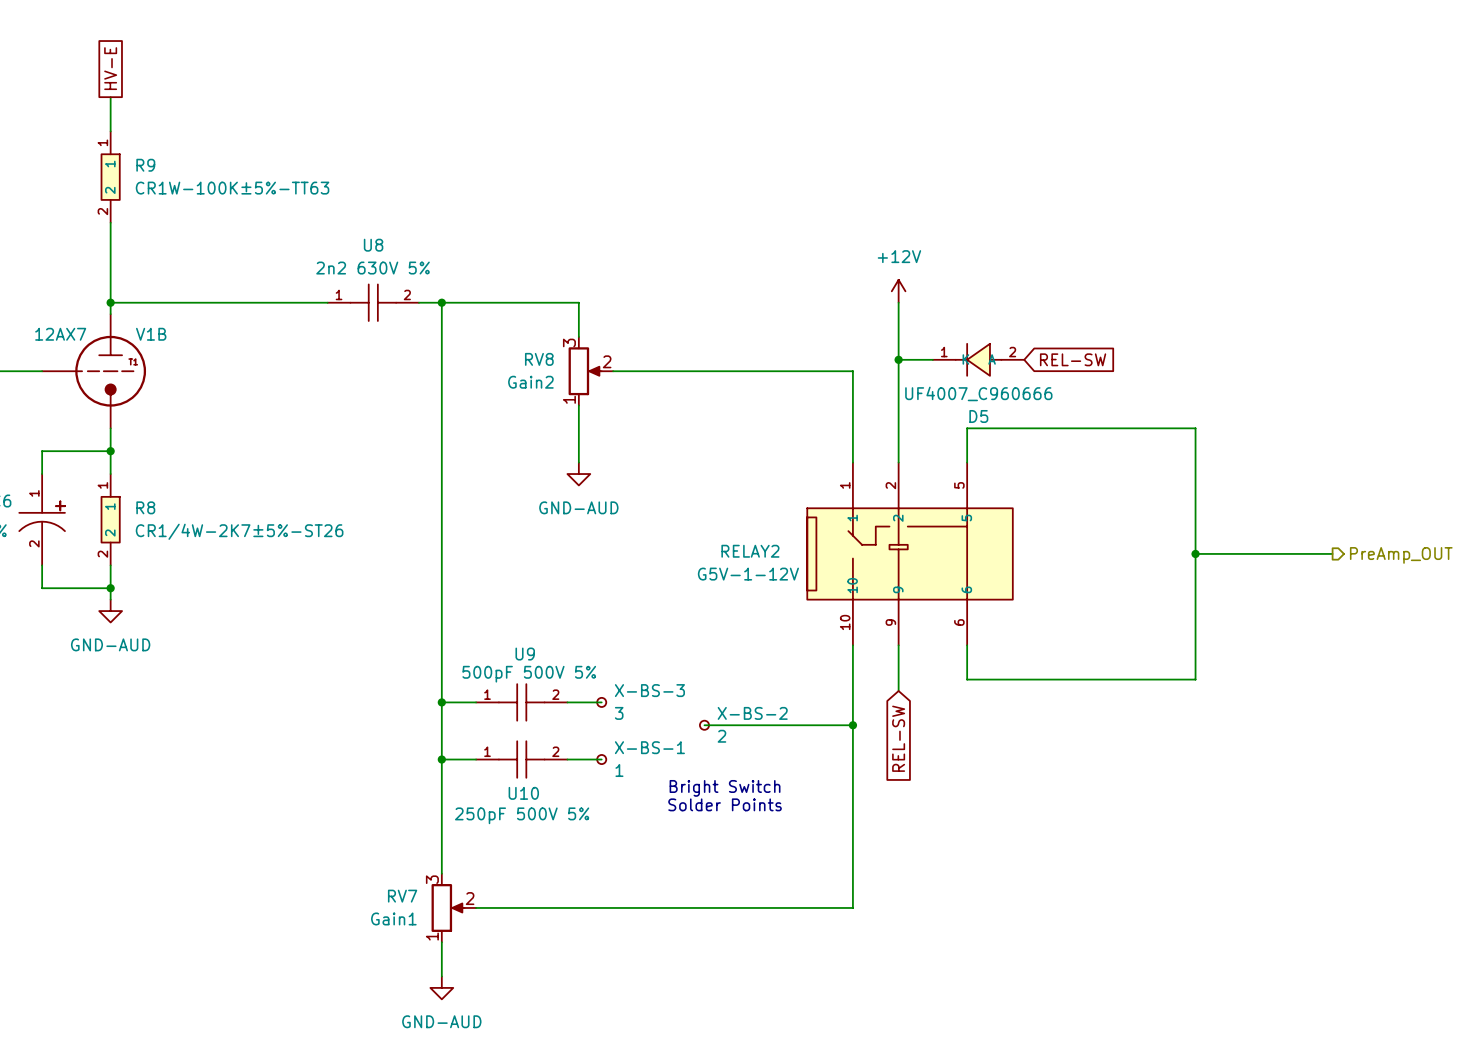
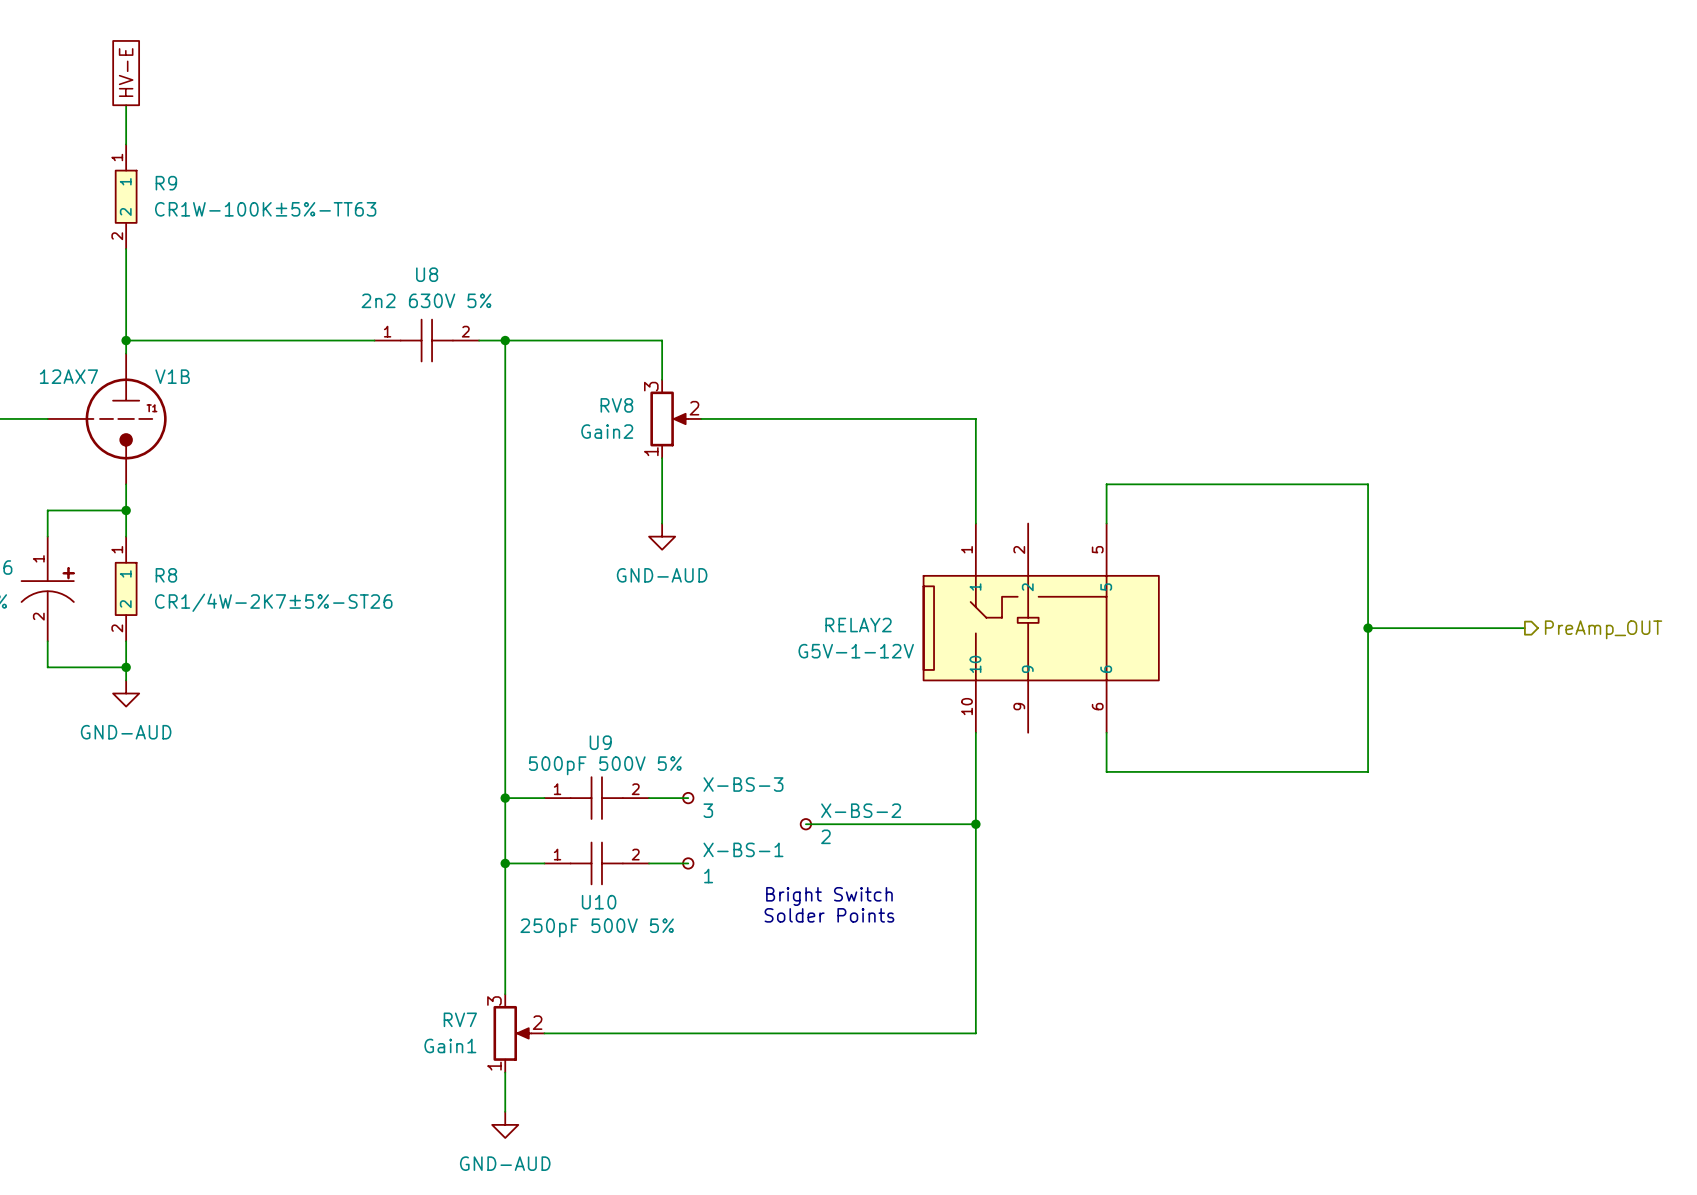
power symbol: +12V (898, 291) -> none
wire: (898, 302) (898, 462) -> none
wire: (898, 359) (932, 359) -> none
junction: (898, 359) -> none
D5: UF4007_C960666 (978, 359) -> none
global label: REL-SW (1073, 359) -> none
wire: (898, 645) (898, 691) -> none
global label: REL-SW (898, 738) -> none

